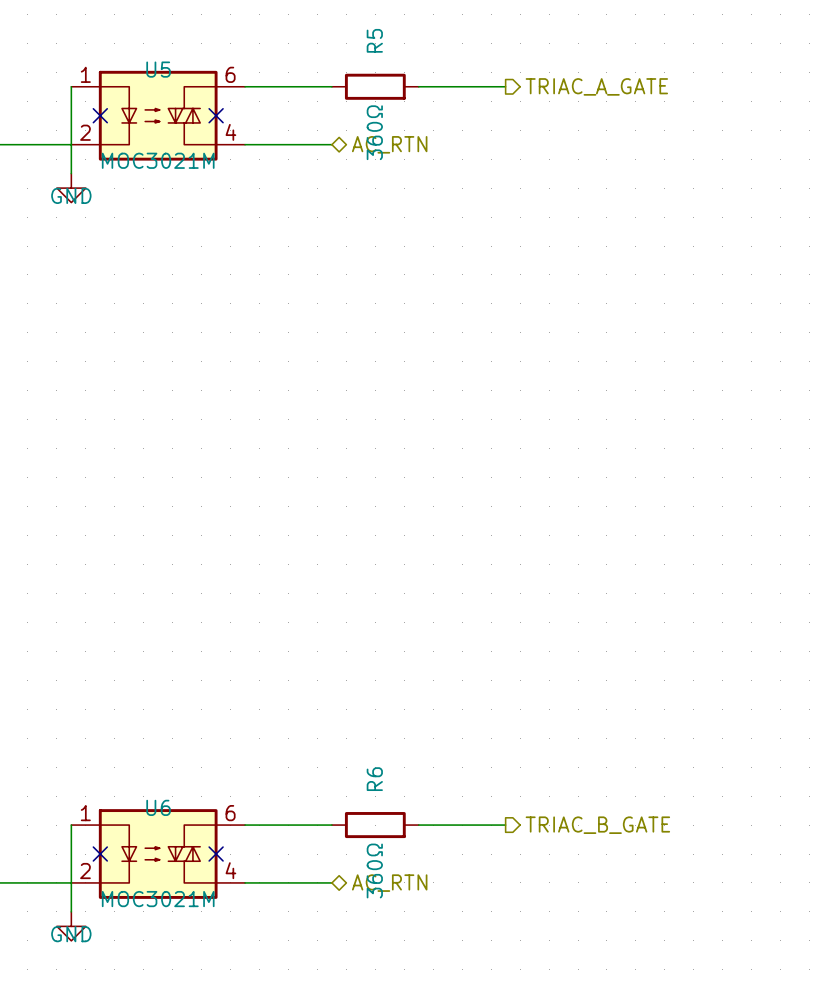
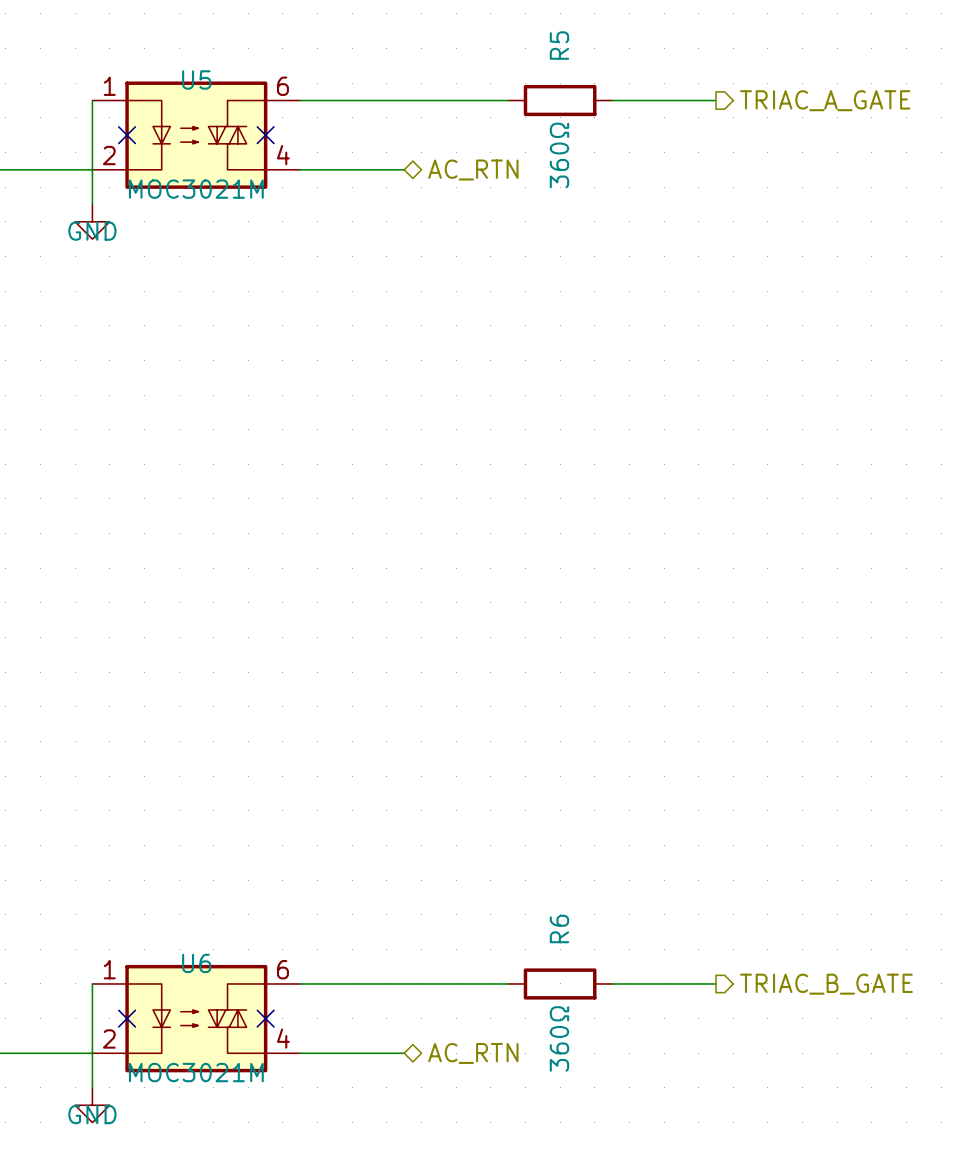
R5 position: (375, 86) -> (560, 100)
wire: (418, 86) (505, 86) -> (508, 100) (404, 100)
wire: none -> (612, 100) (716, 100)
hierarchical label position: TRIAC_A_GATE (596, 86) -> TRIAC_A_GATE (825, 100)
R6 position: (375, 825) -> (560, 983)
wire: (418, 825) (505, 825) -> (508, 983) (404, 983)
wire: none -> (612, 983) (716, 983)
hierarchical label position: TRIAC_B_GATE (597, 825) -> TRIAC_B_GATE (826, 984)

